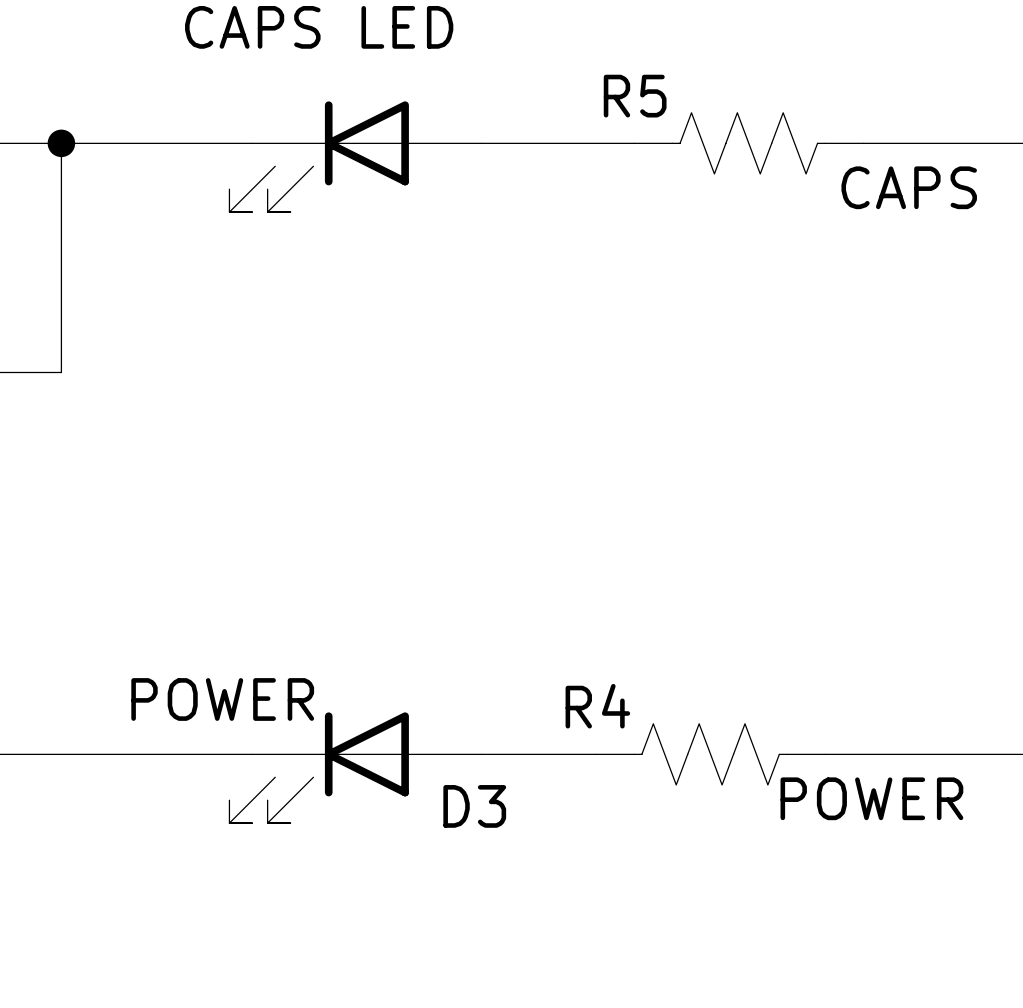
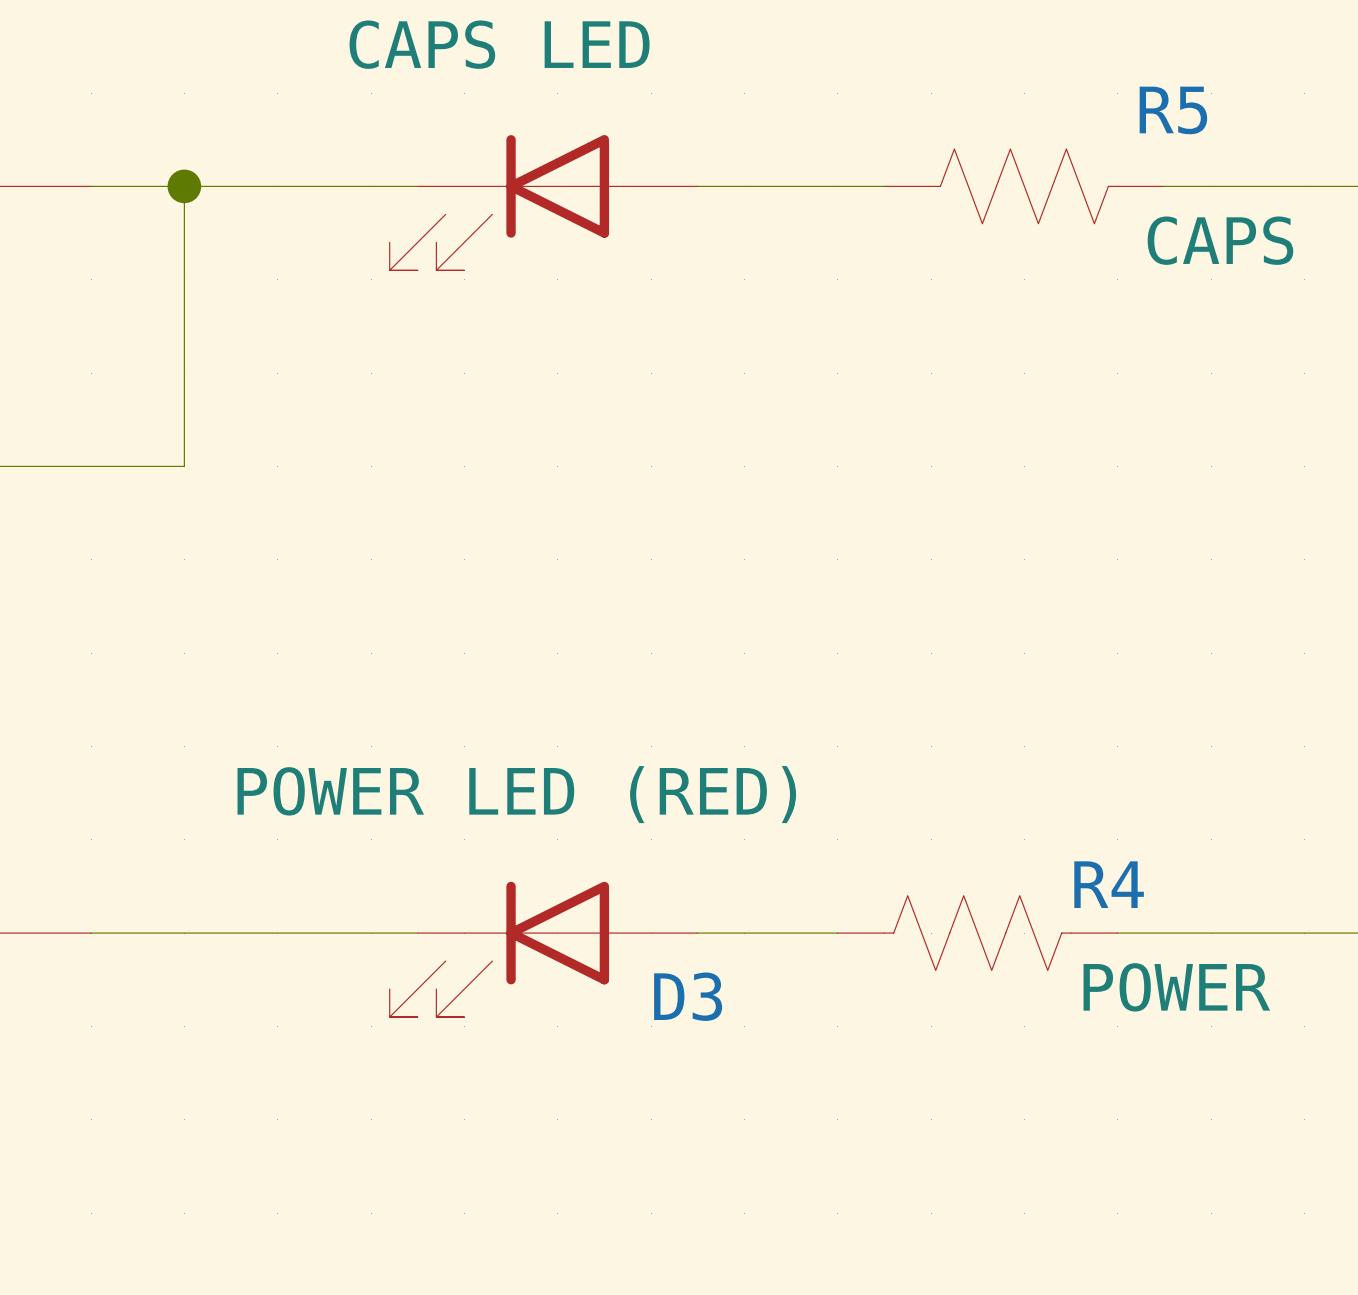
R5 name position: R5 (635, 96) -> R5 (1173, 110)
D3 value: POWER (222, 699) -> POWER LED (RED) (516, 794)
R4 name position: R4 (597, 706) -> R4 (1109, 884)

